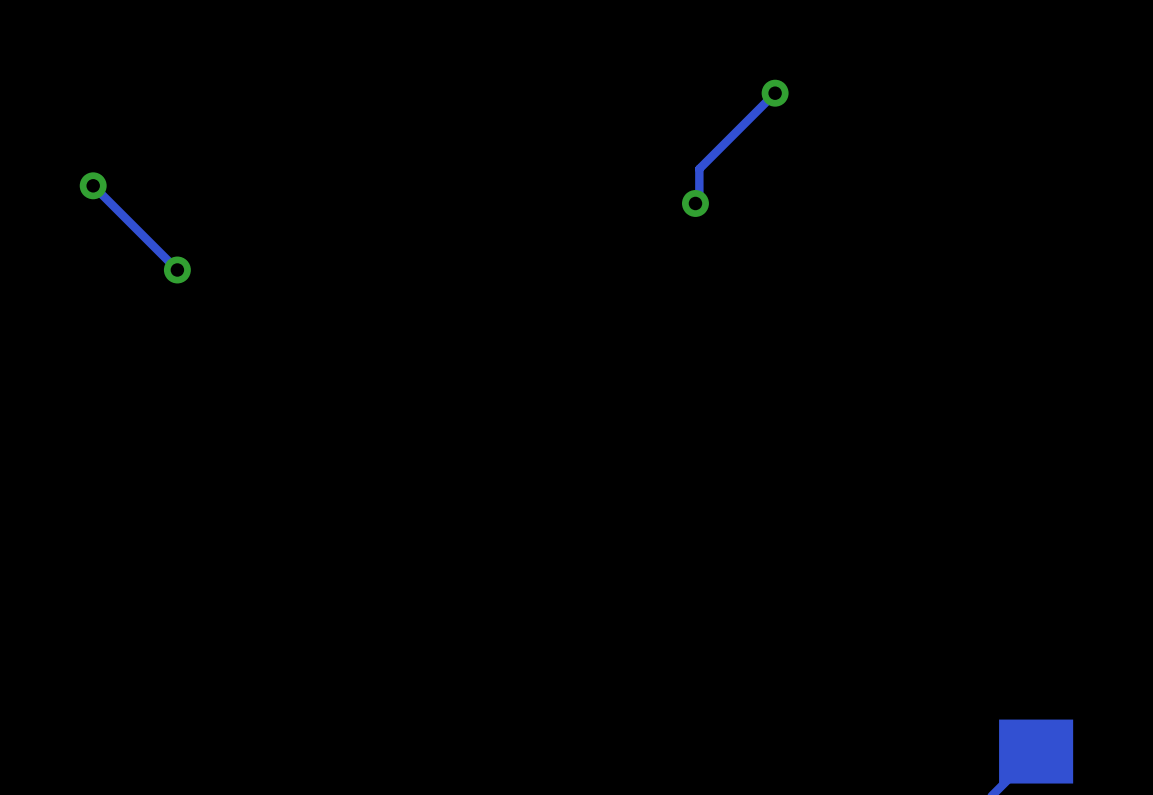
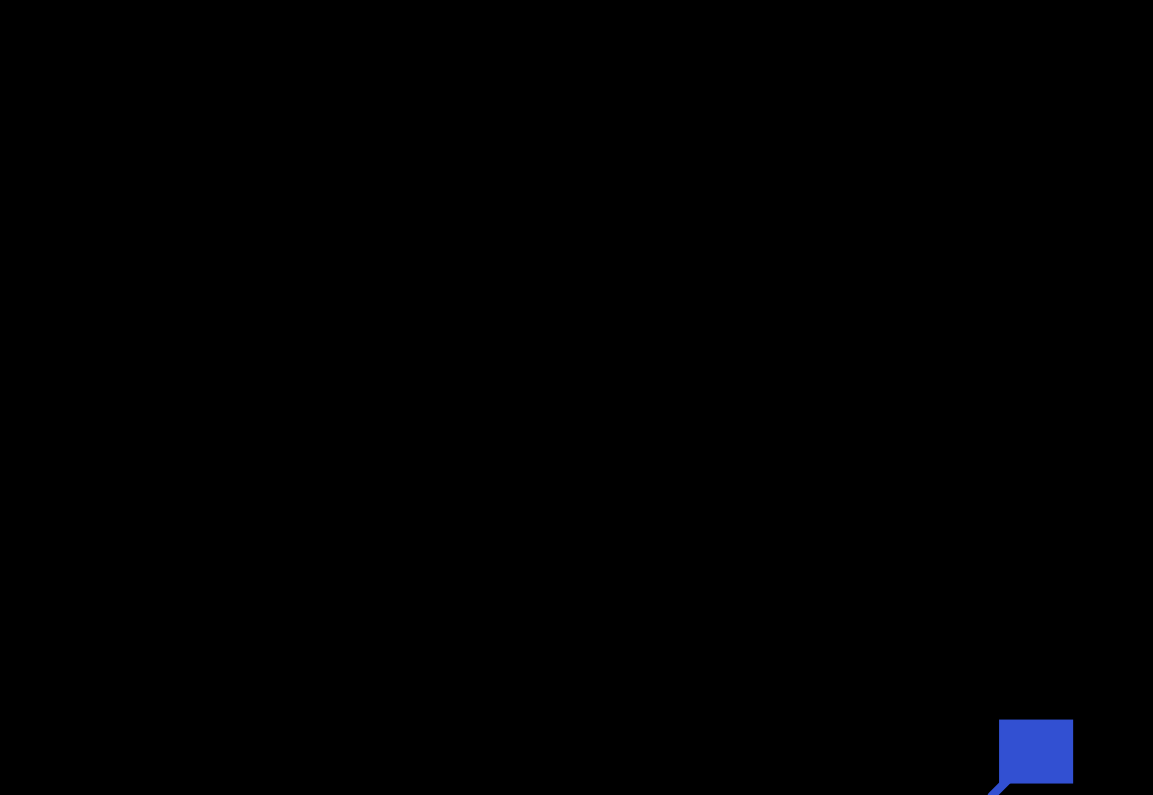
track: (775, 93) (699, 168) (699, 202) (695, 203) -> none
via: (775, 93) -> none
track: (93, 185) (177, 269) -> none
via: (93, 185) -> none
via: (695, 203) -> none
via: (177, 269) -> none

